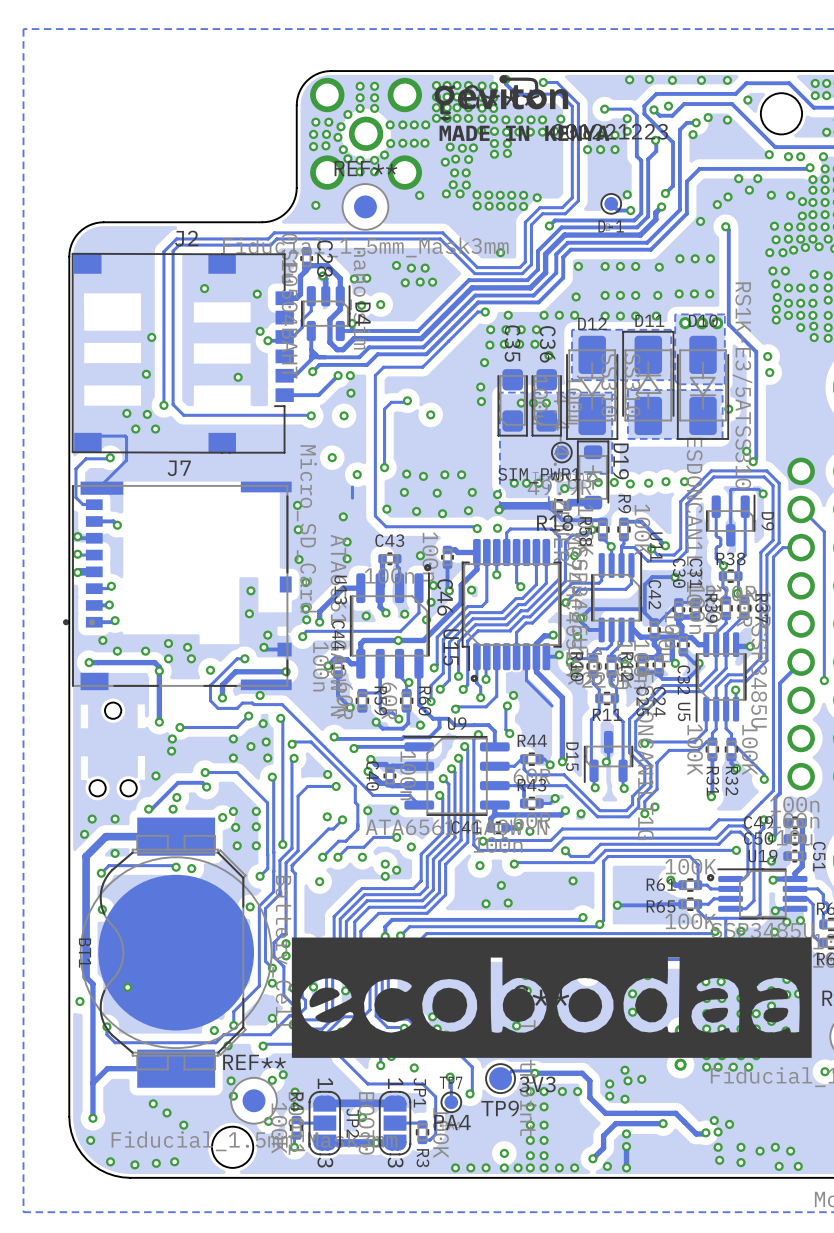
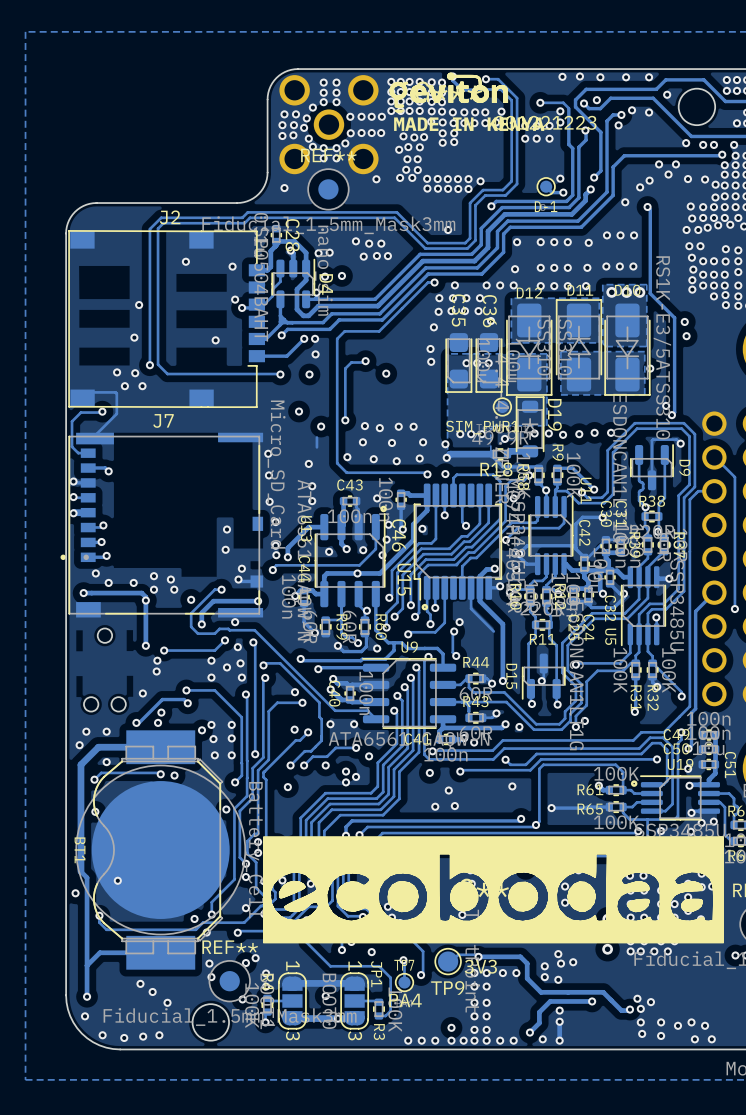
drawing: none -> [389, 72, 509, 114]
drawing: none -> [263, 836, 724, 944]
JP2 name: JP2 (352, 1123) -> none

